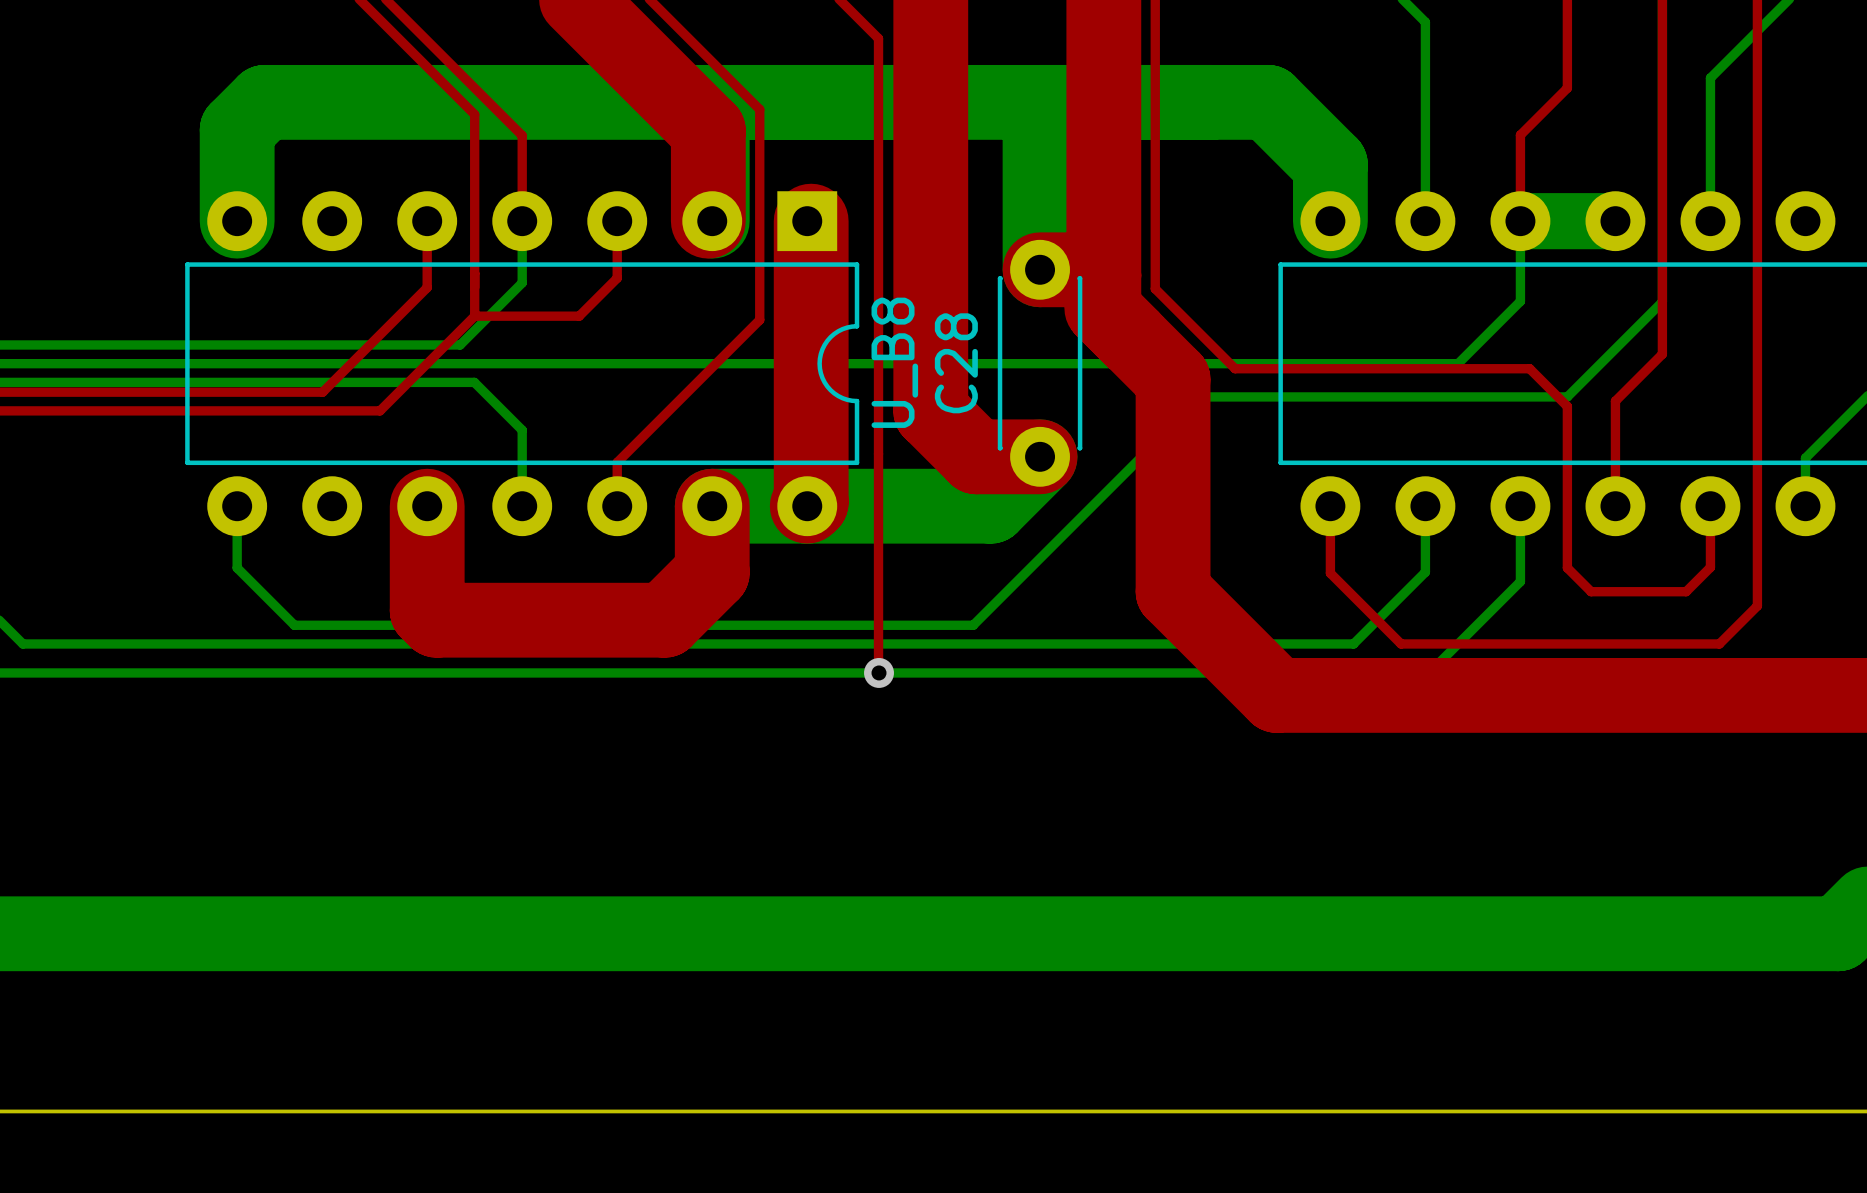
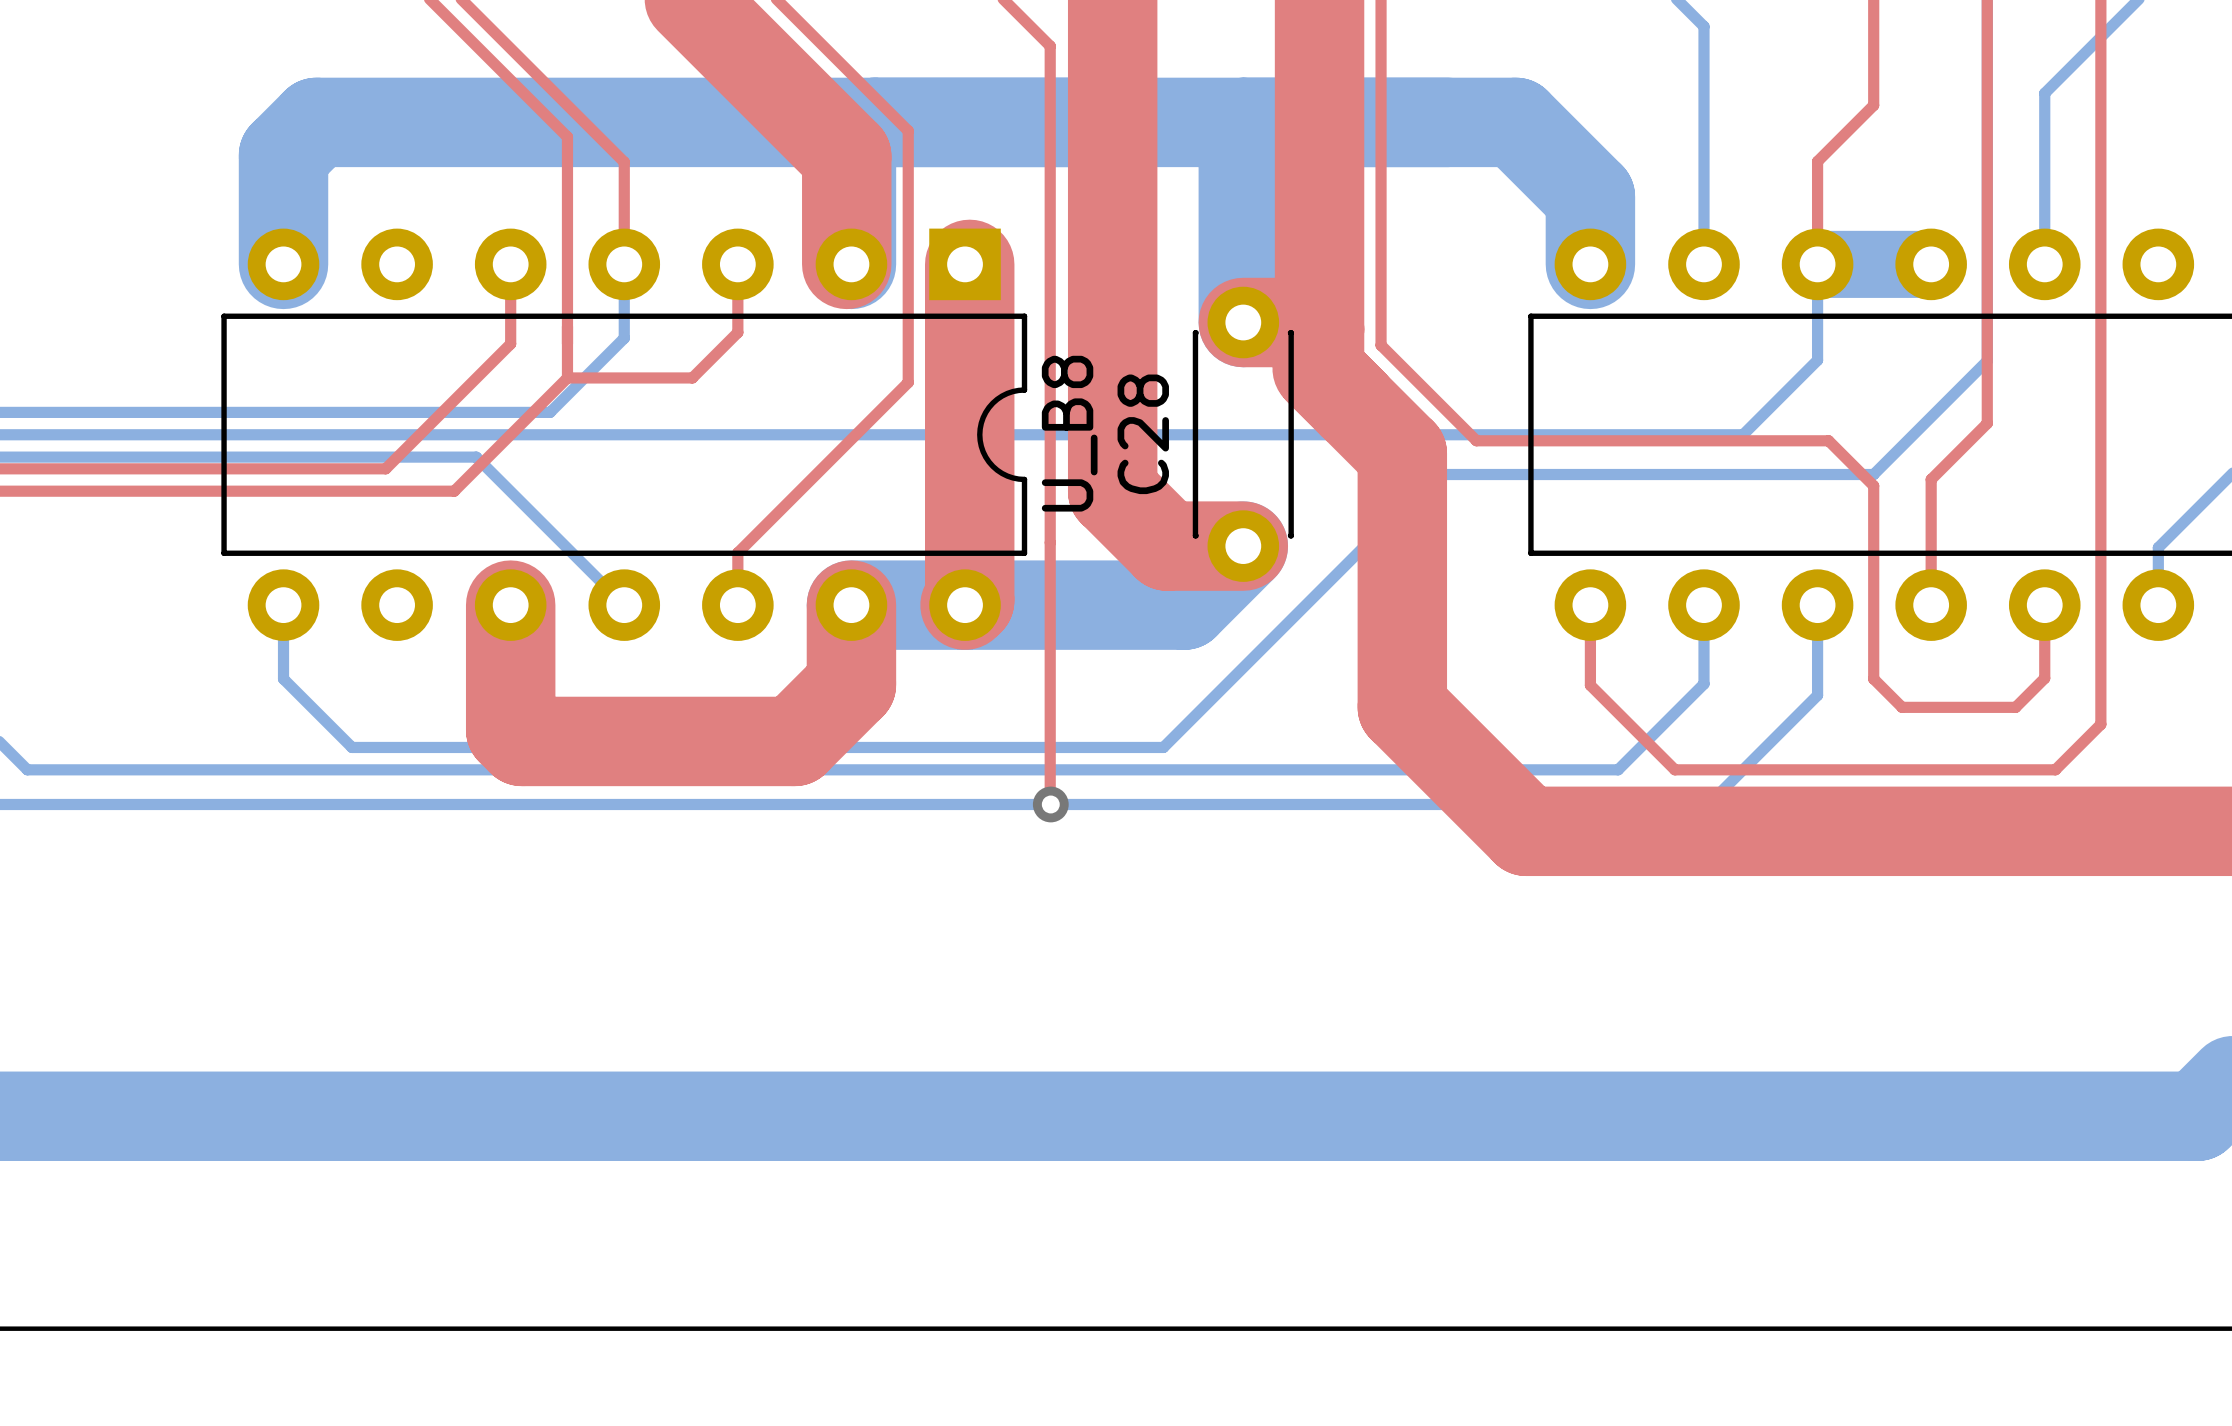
bottom track: (398, 382) (474, 382) (522, 430) (522, 506) -> (476, 457) (624, 605)

